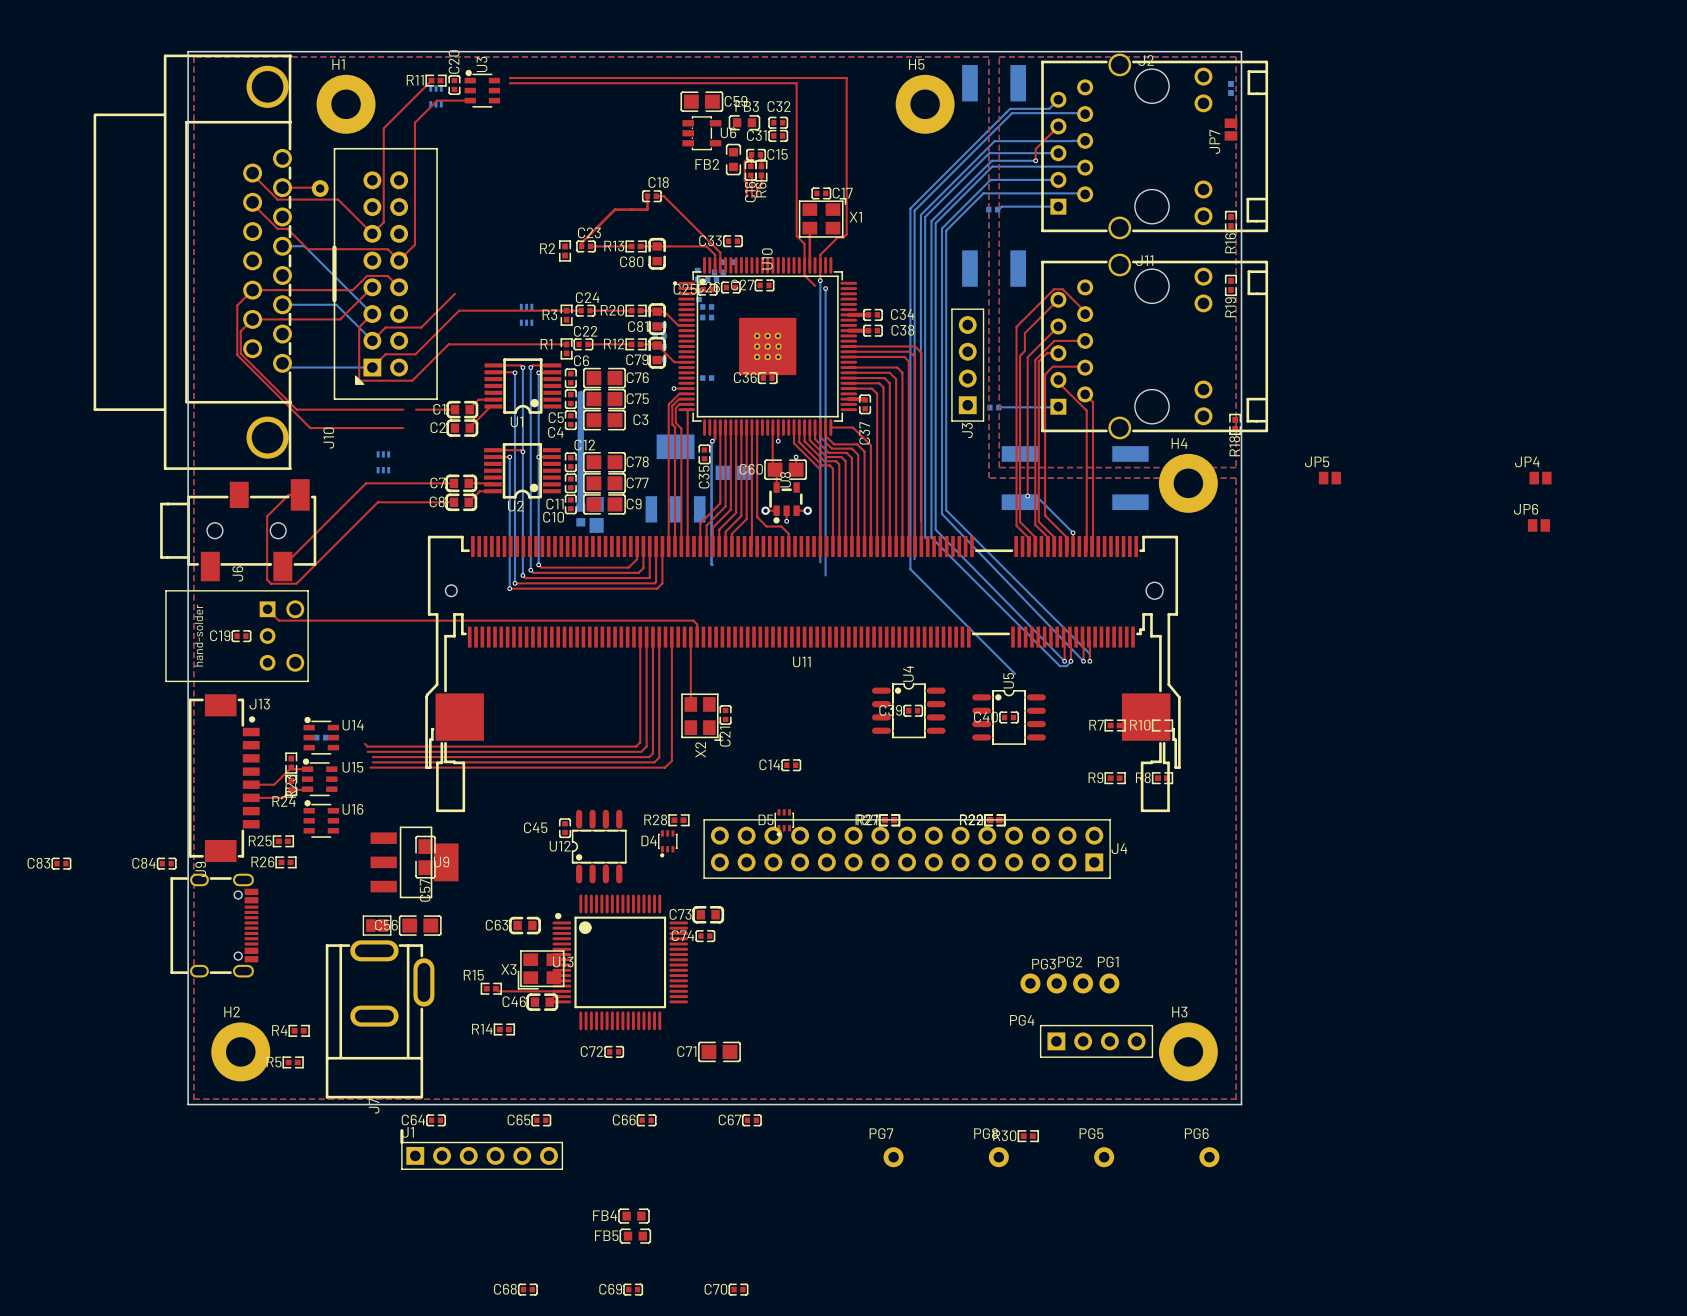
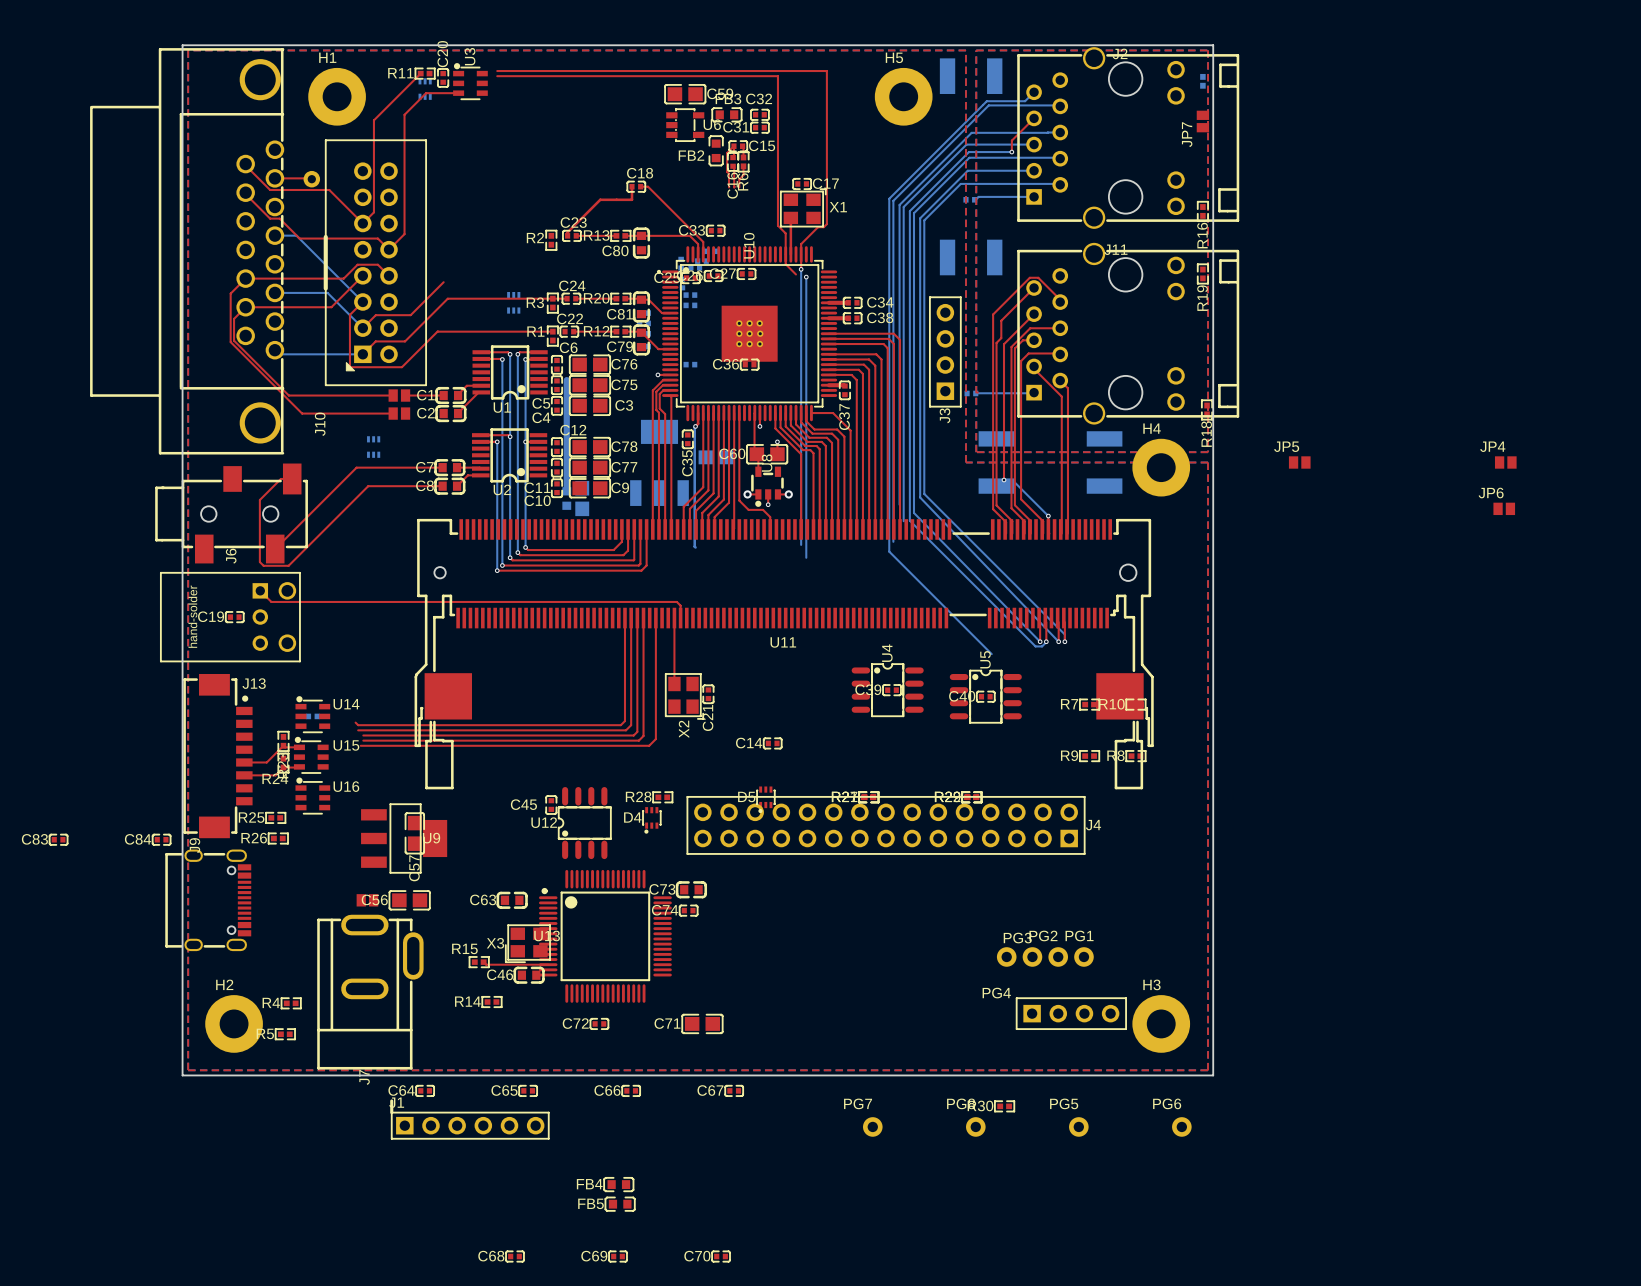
part: none -> (399, 395)
part: none -> (399, 413)
part footprint: [362, 915, 392, 936] -> [356, 894, 379, 907]

